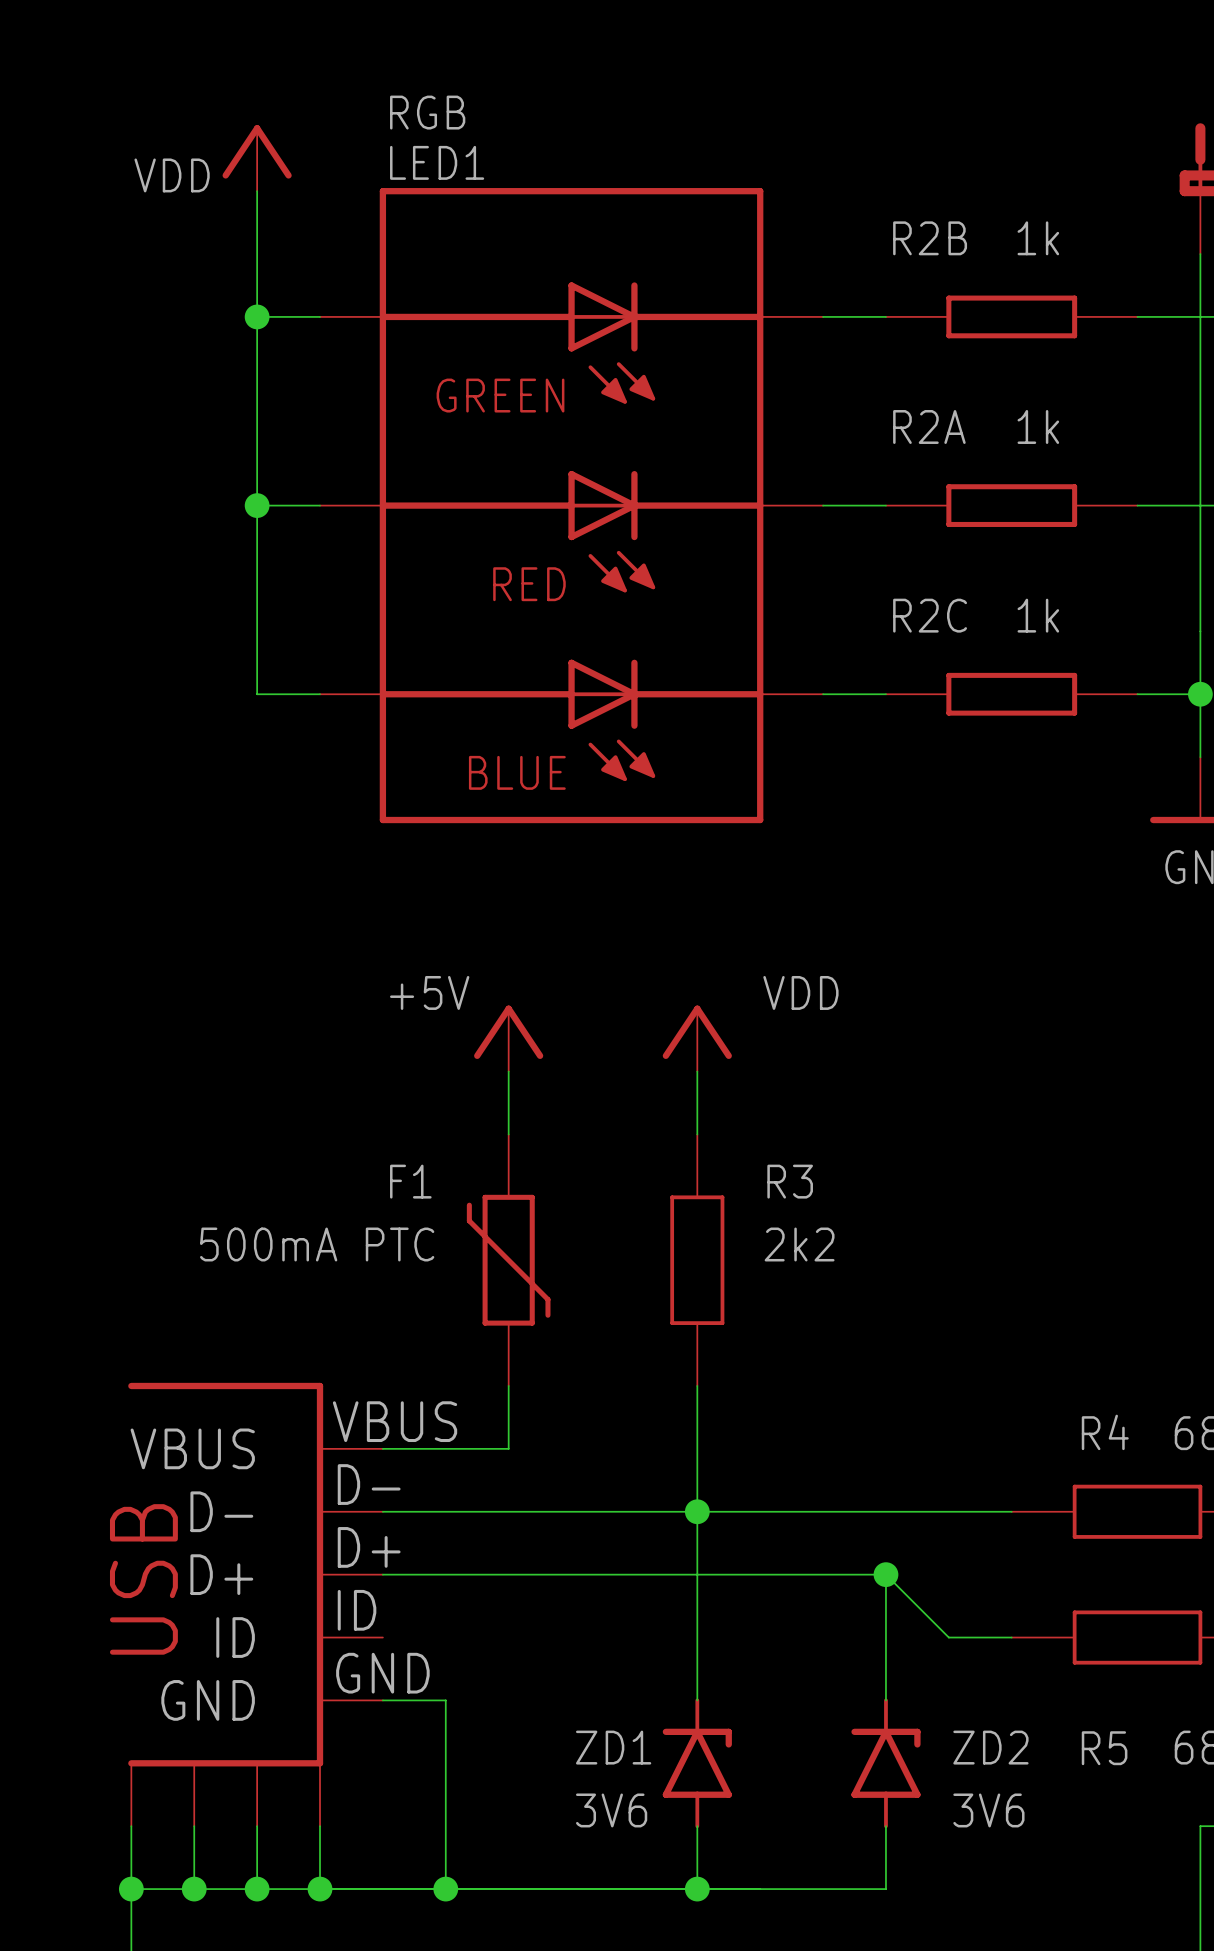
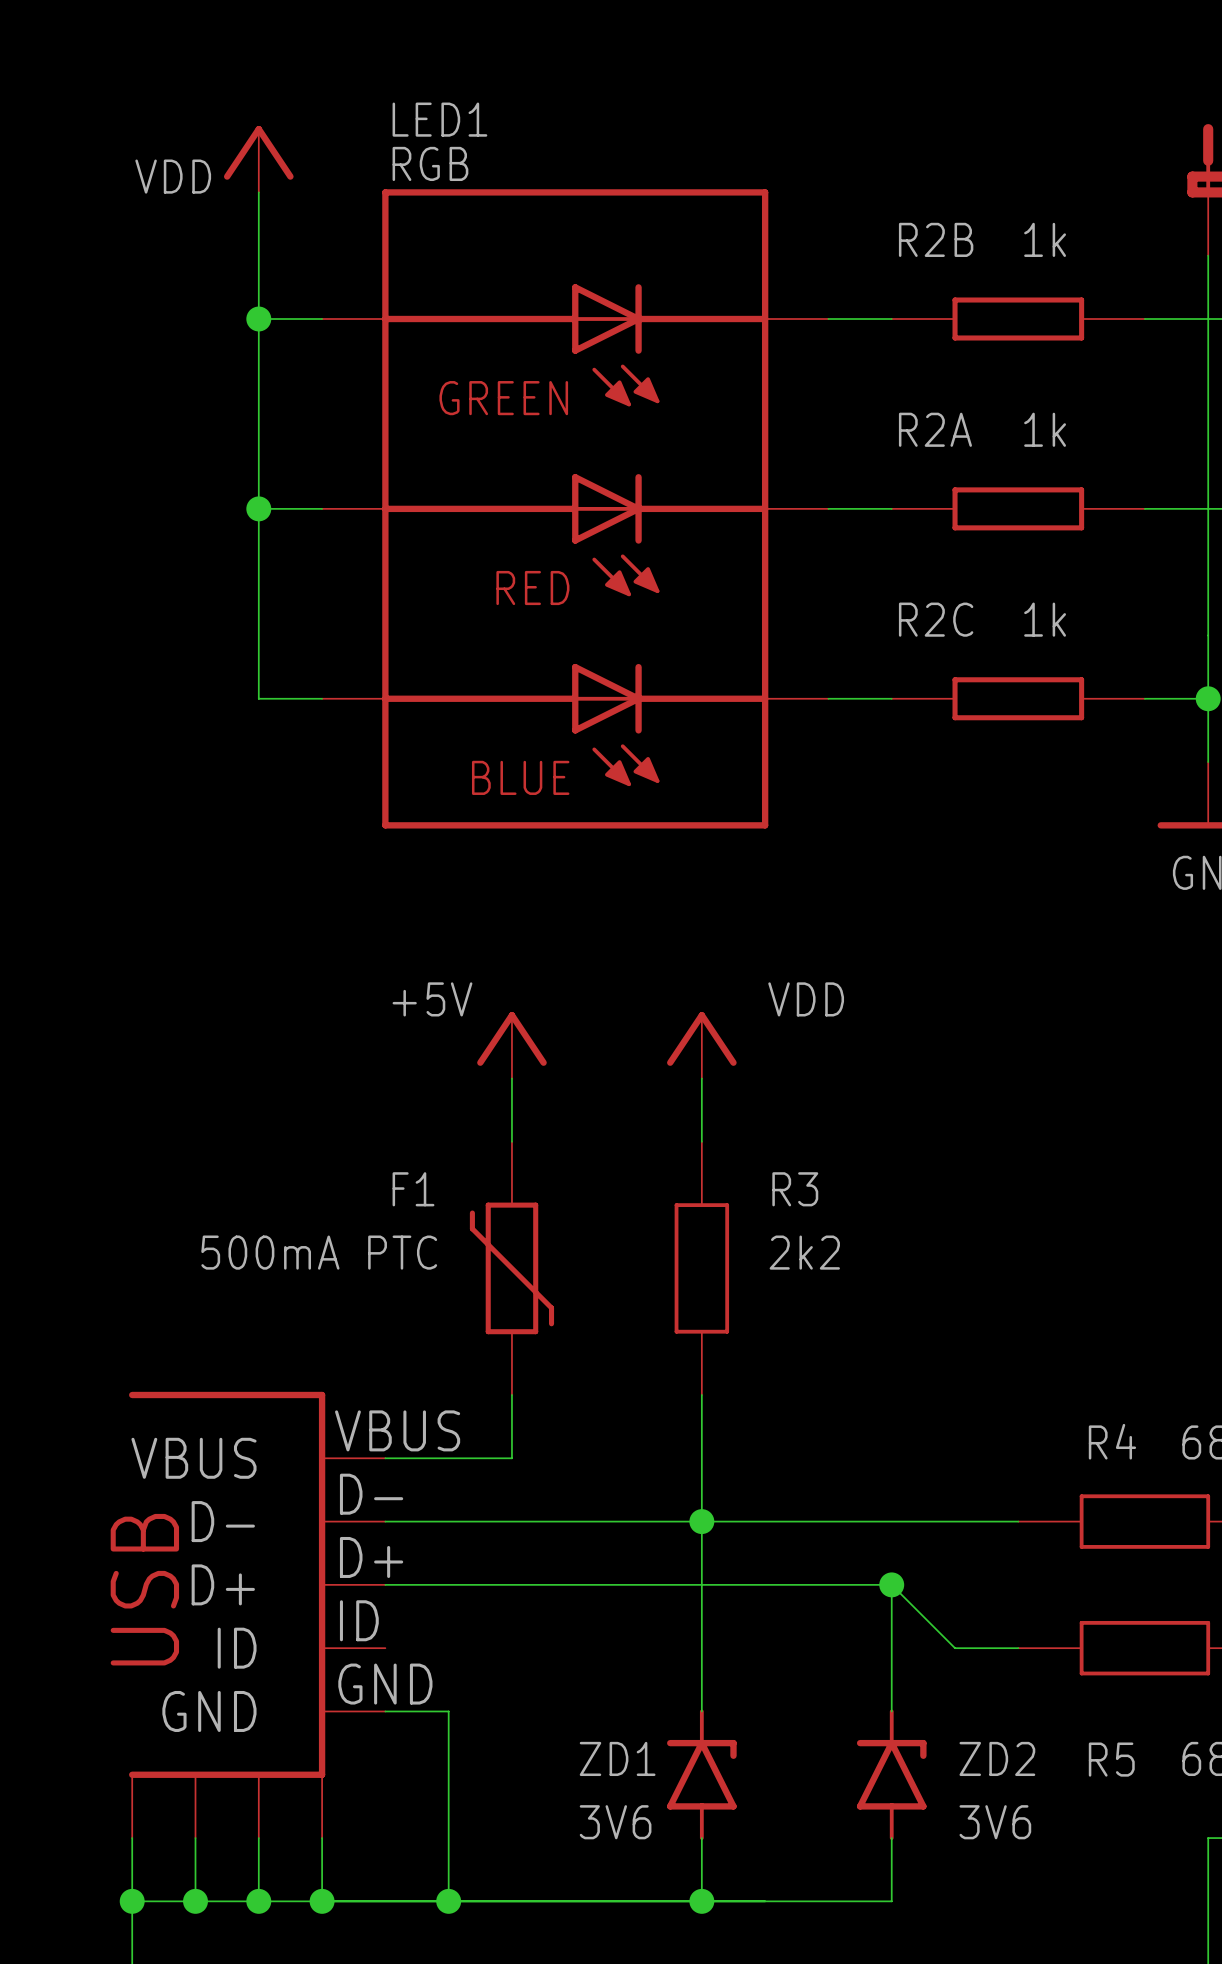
LED1 value position: RGB (427, 112) -> RGB (430, 163)
LED1 name position: LED1 (437, 162) -> LED1 (439, 119)

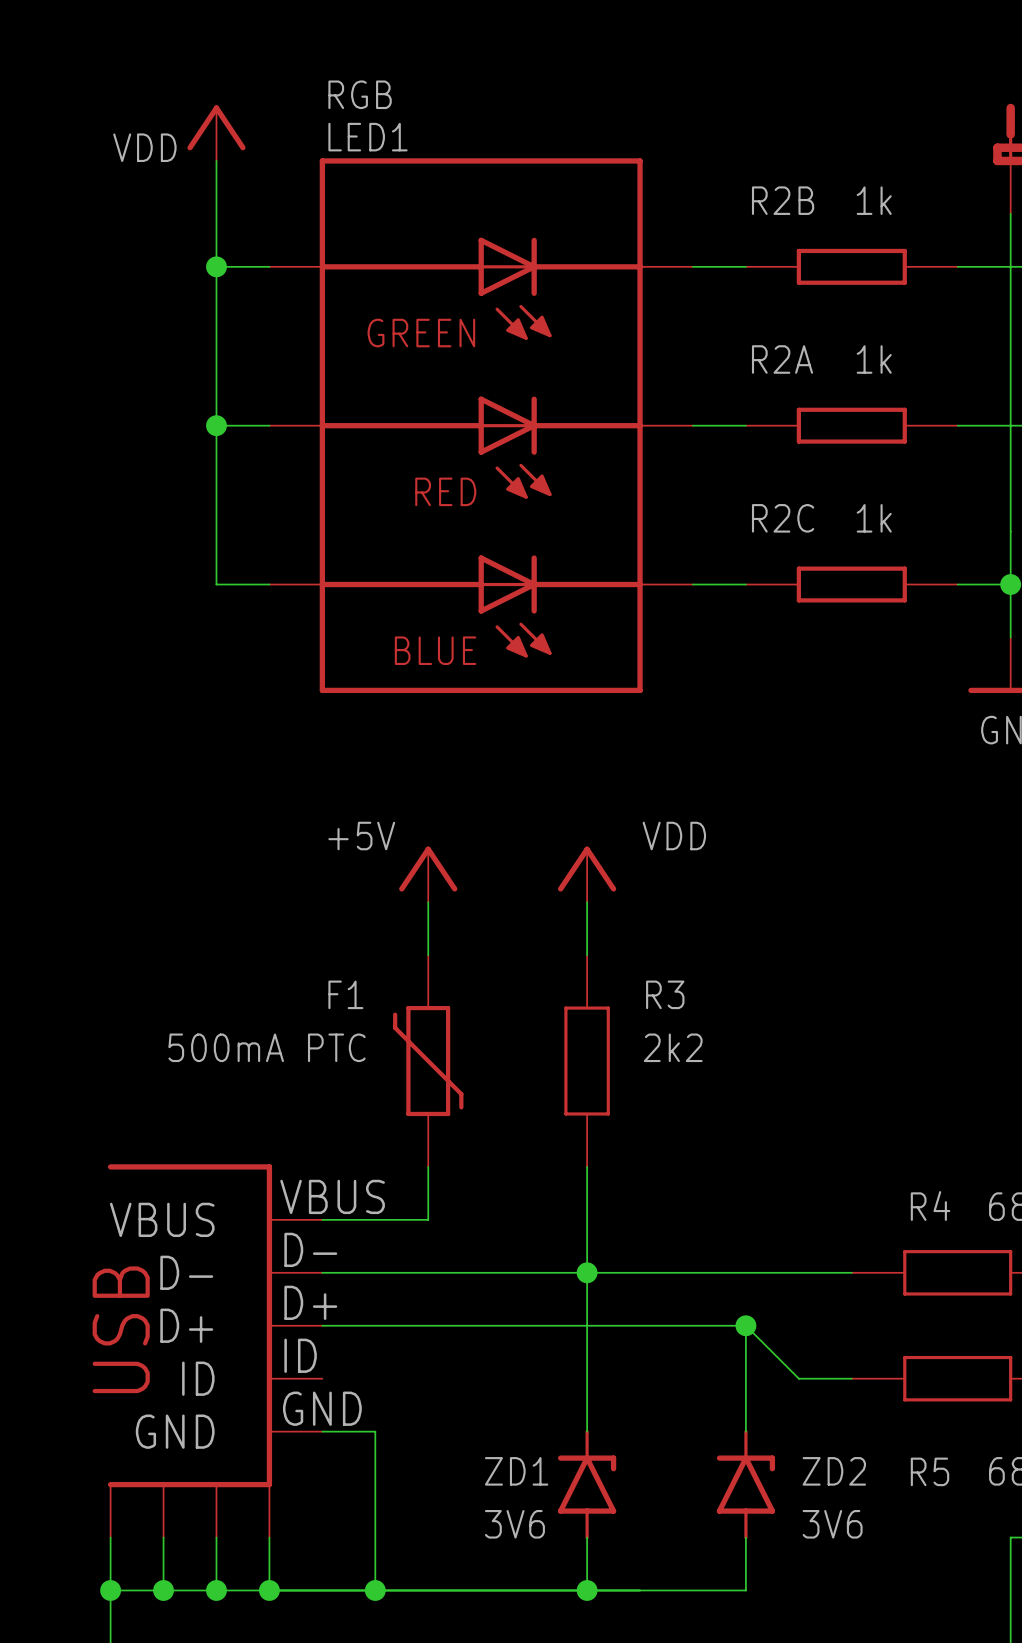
LED1 name position: LED1 (439, 119) -> LED1 (368, 137)
LED1 value position: RGB (430, 163) -> RGB (360, 94)

